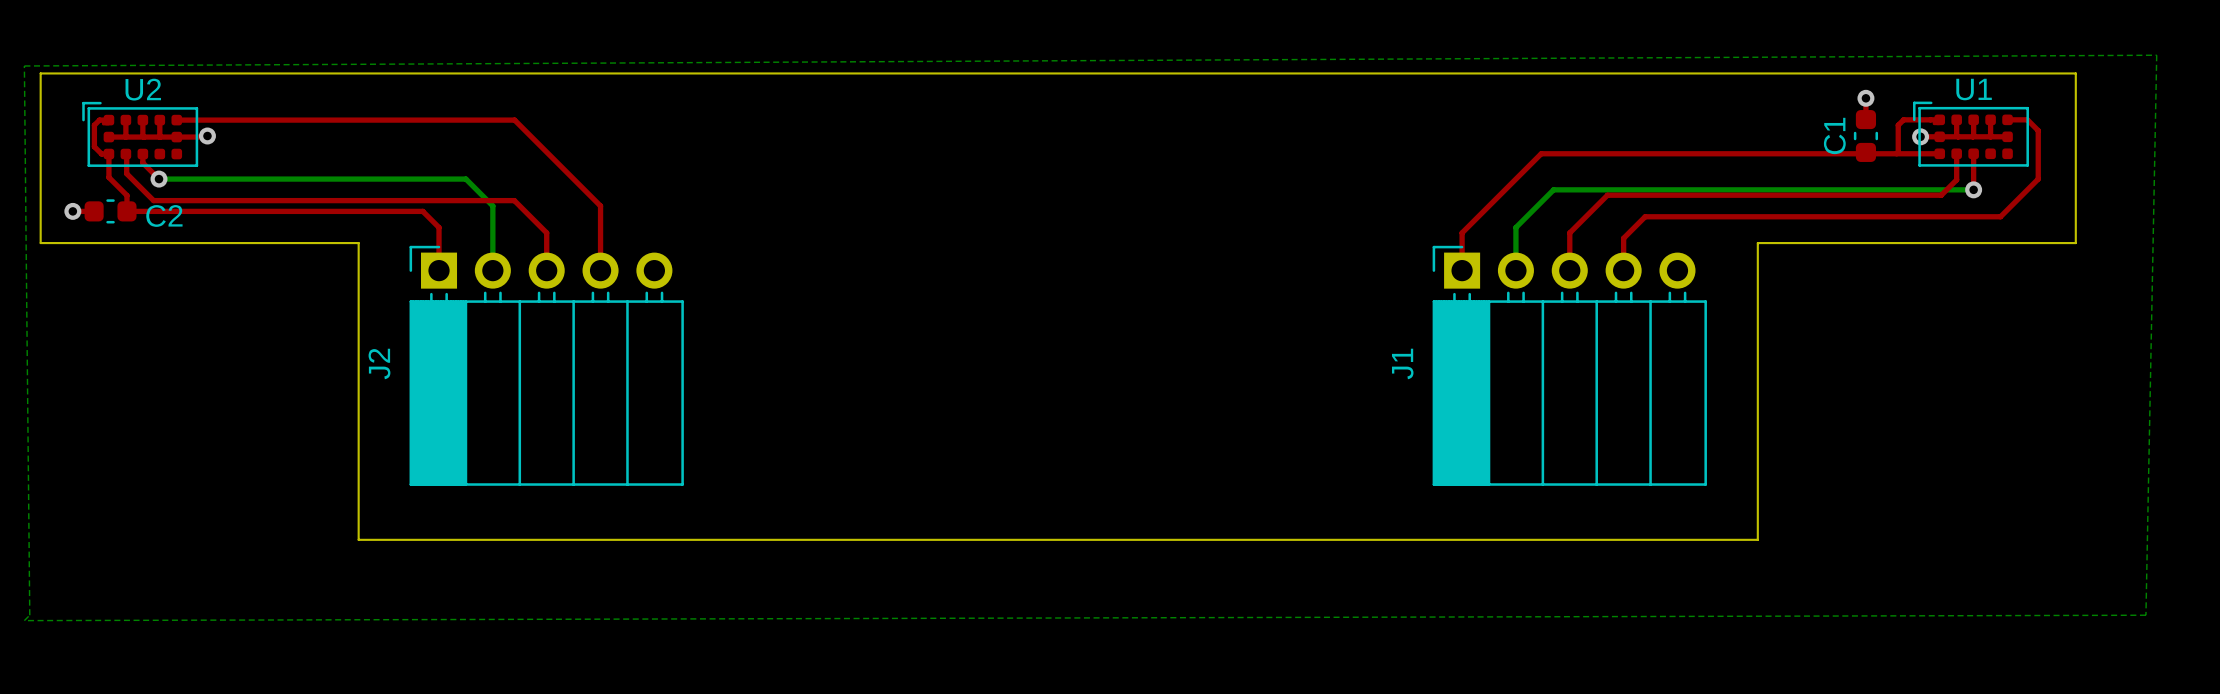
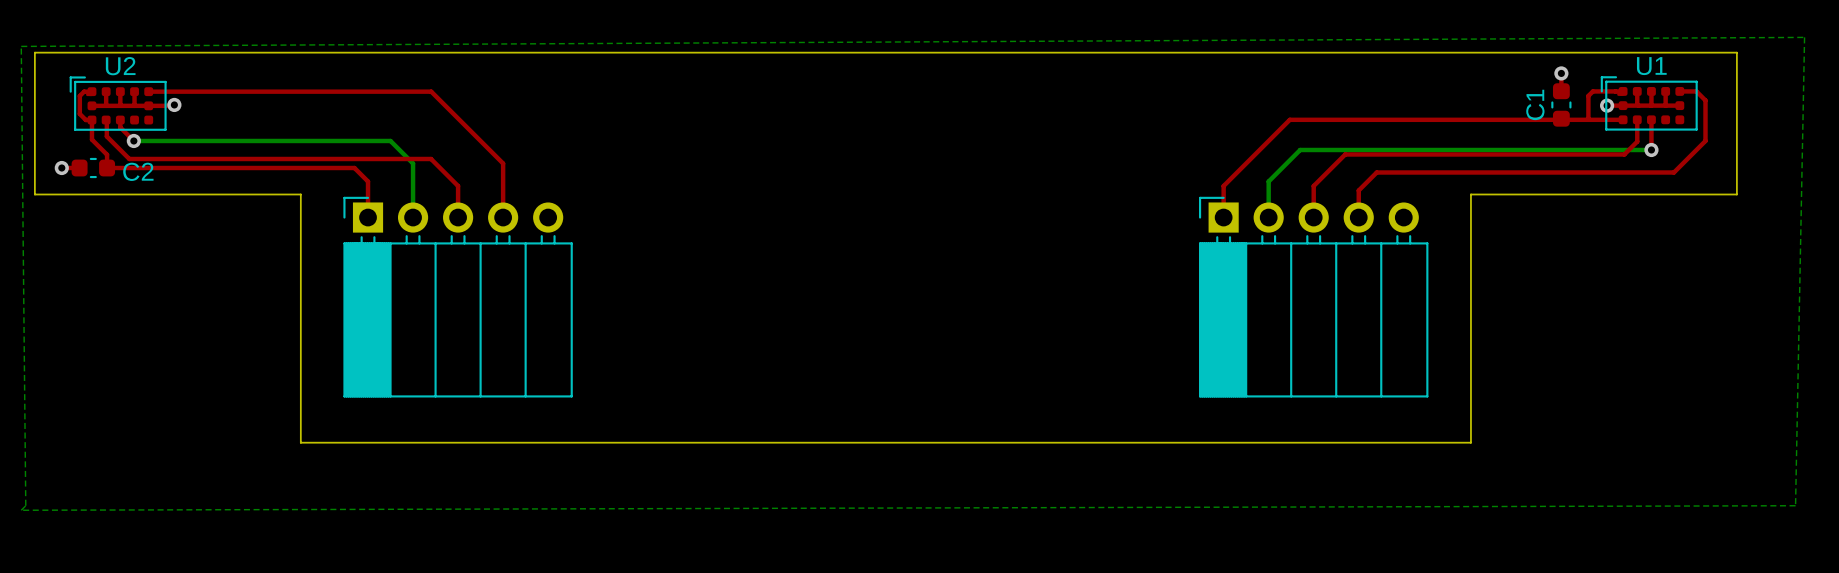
J1 name: J1 (1402, 363) -> none
J2 name: J2 (379, 364) -> none

